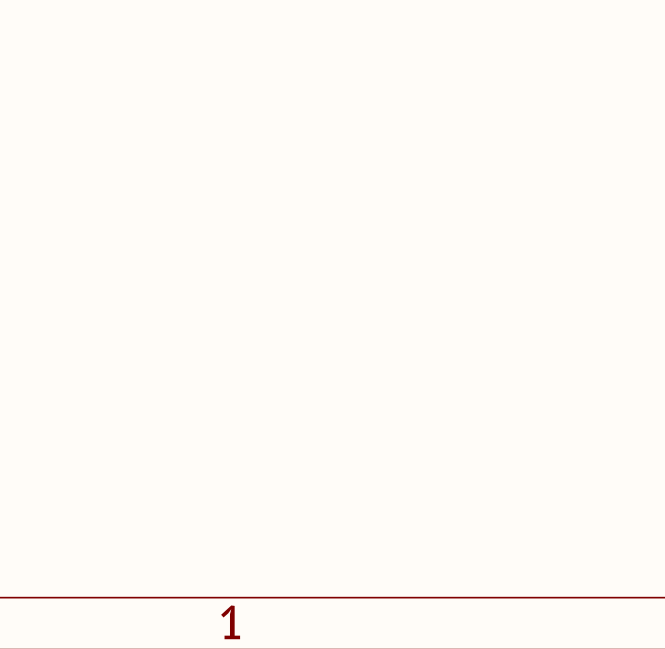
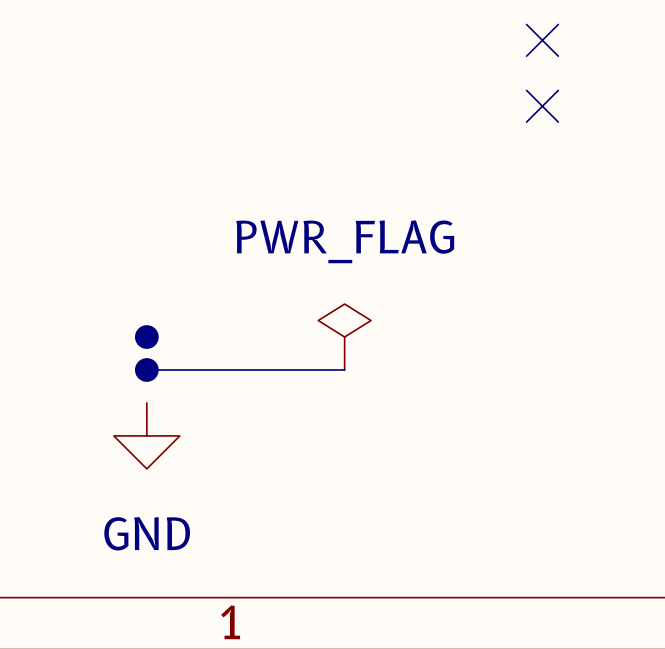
no-connect mark: none -> (542, 40)
no-connect mark: none -> (542, 106)
junction: none -> (146, 337)
power symbol: none -> PWR_FLAG (344, 337)
wire: none -> (146, 369) (344, 369)
junction: none -> (146, 369)
power symbol: none -> GND (146, 435)

